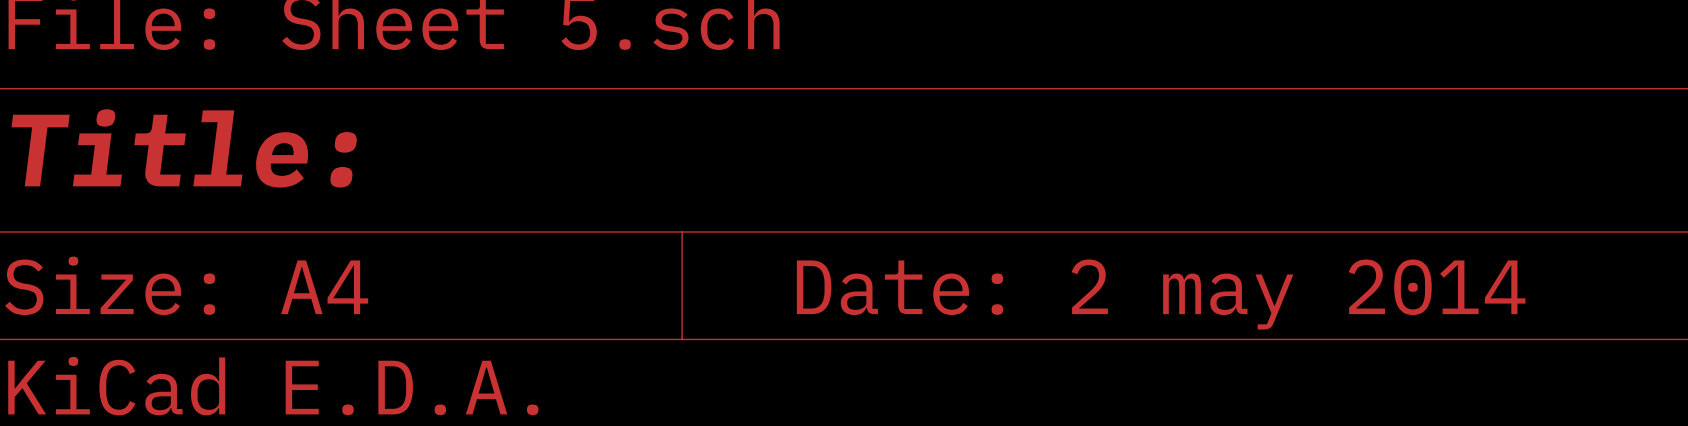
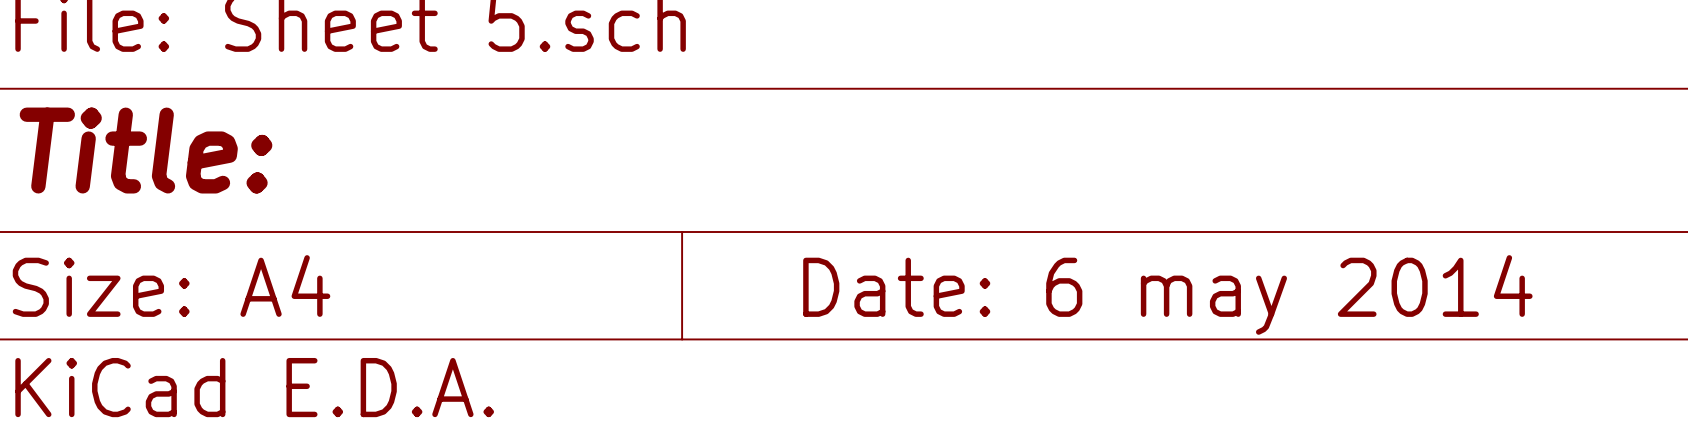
title block: Date: 2 may 2014 (1161, 294) -> Date: 6 may 2014 (1167, 294)

